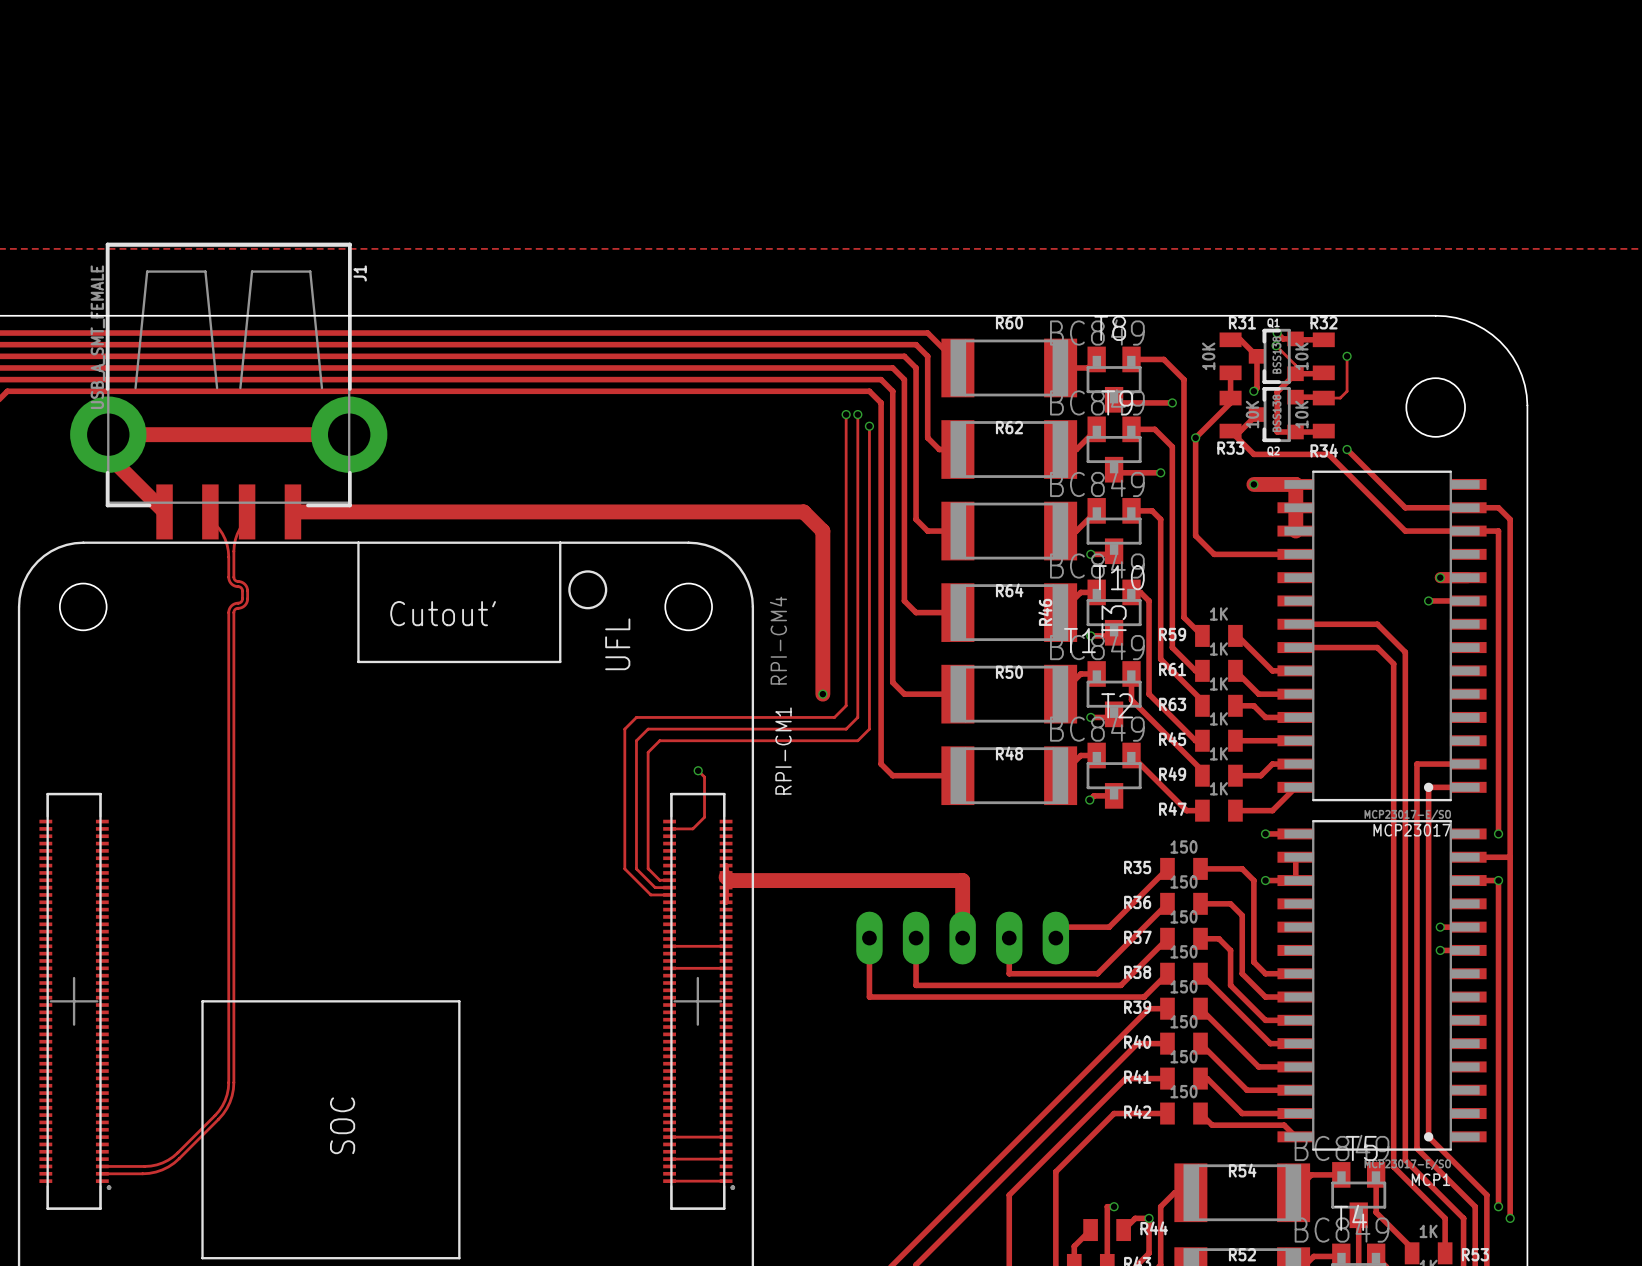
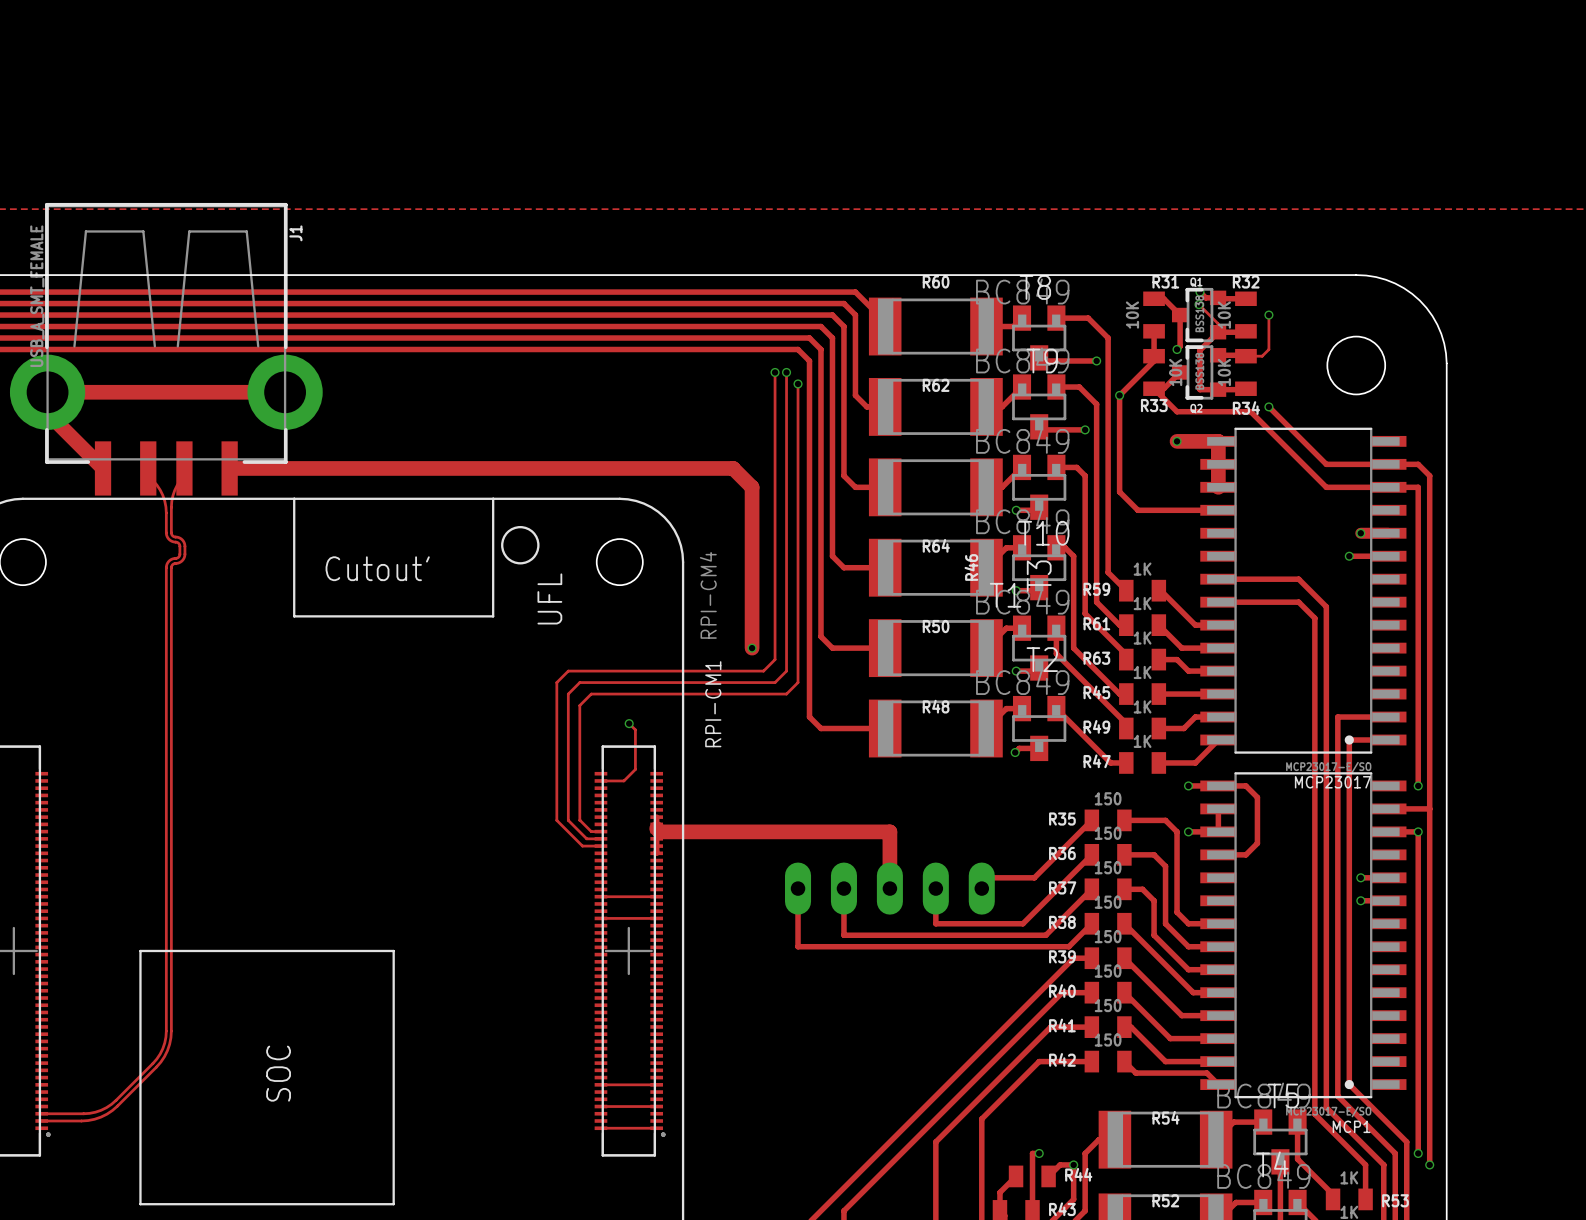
track: none -> (1218, 785) (1245, 785) (1257, 797) (1257, 843) (1245, 854) (1218, 854)

